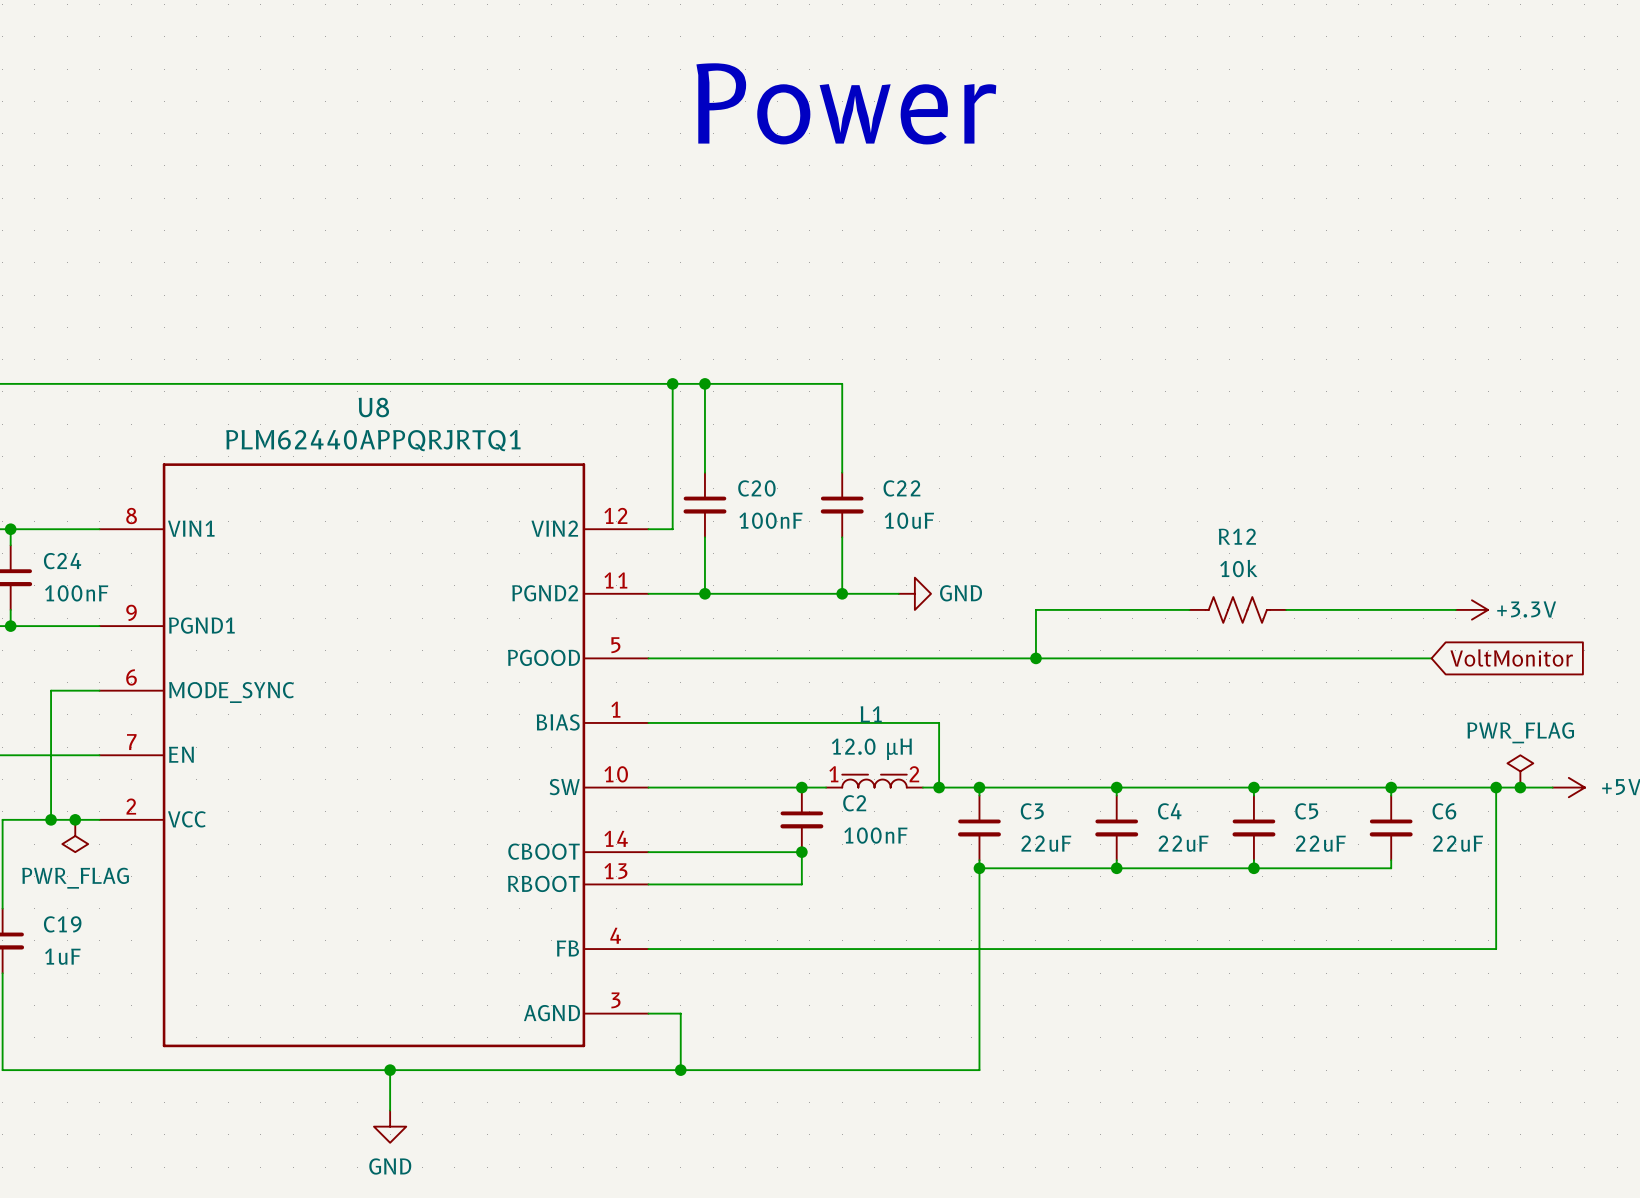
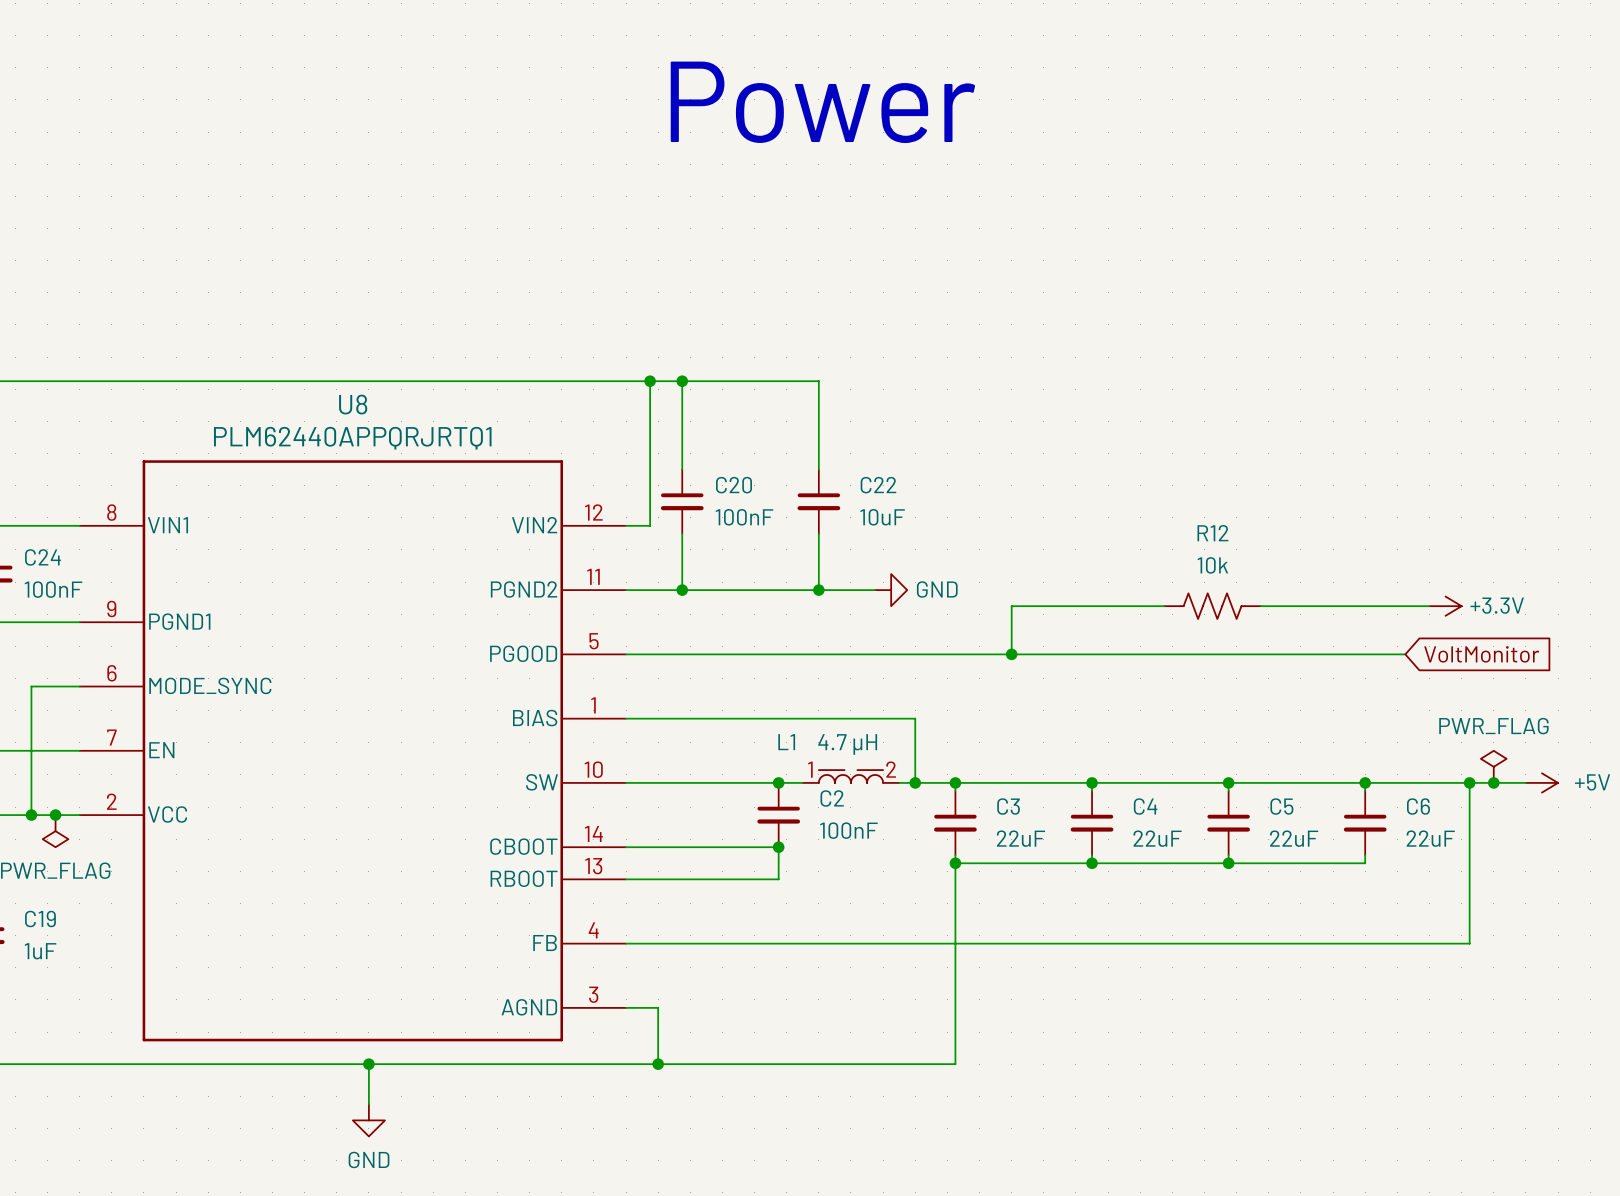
L1 name position: L1 (871, 714) -> L1 (786, 742)
L1 text: 12.0 µH (871, 749) -> 4.7 µH (847, 744)

